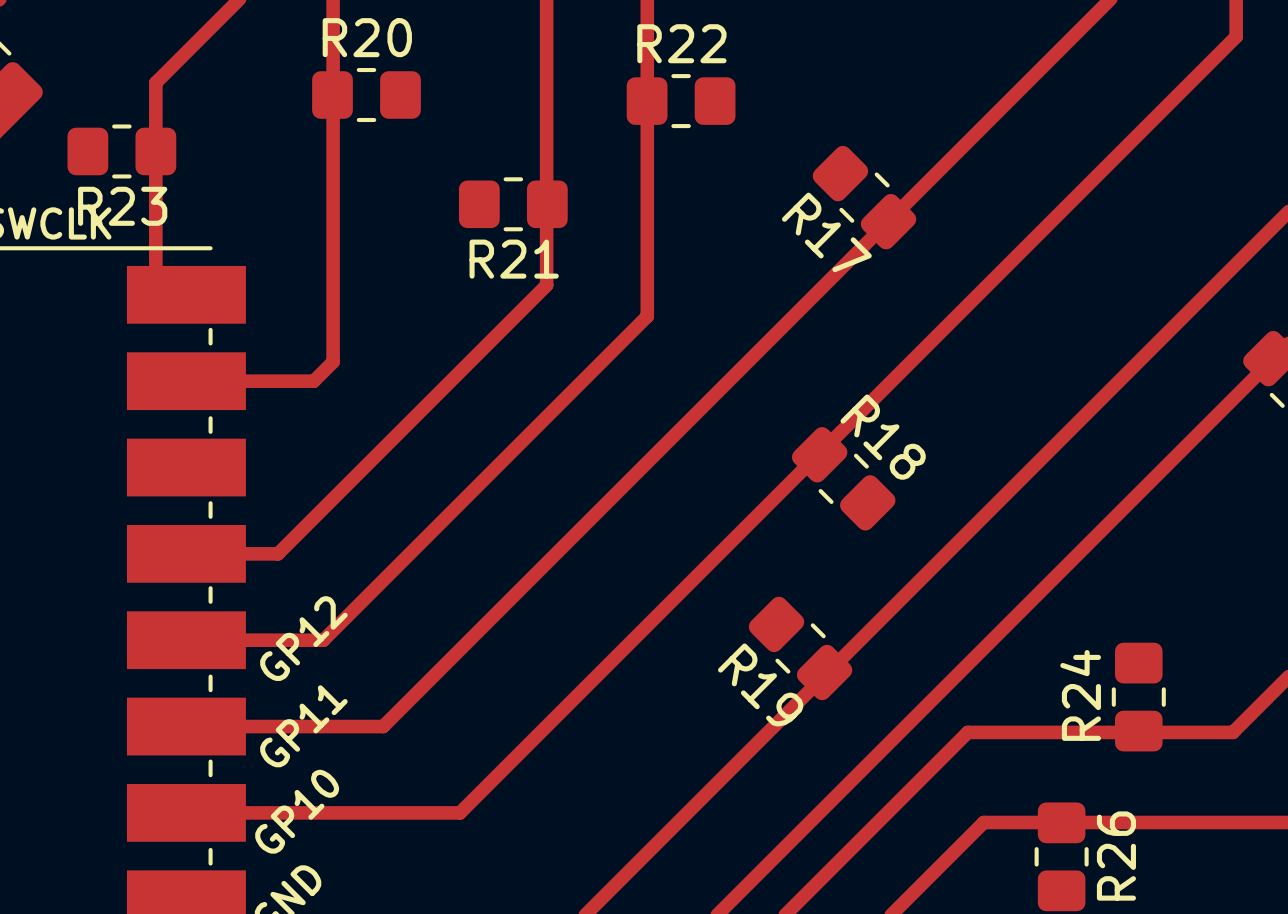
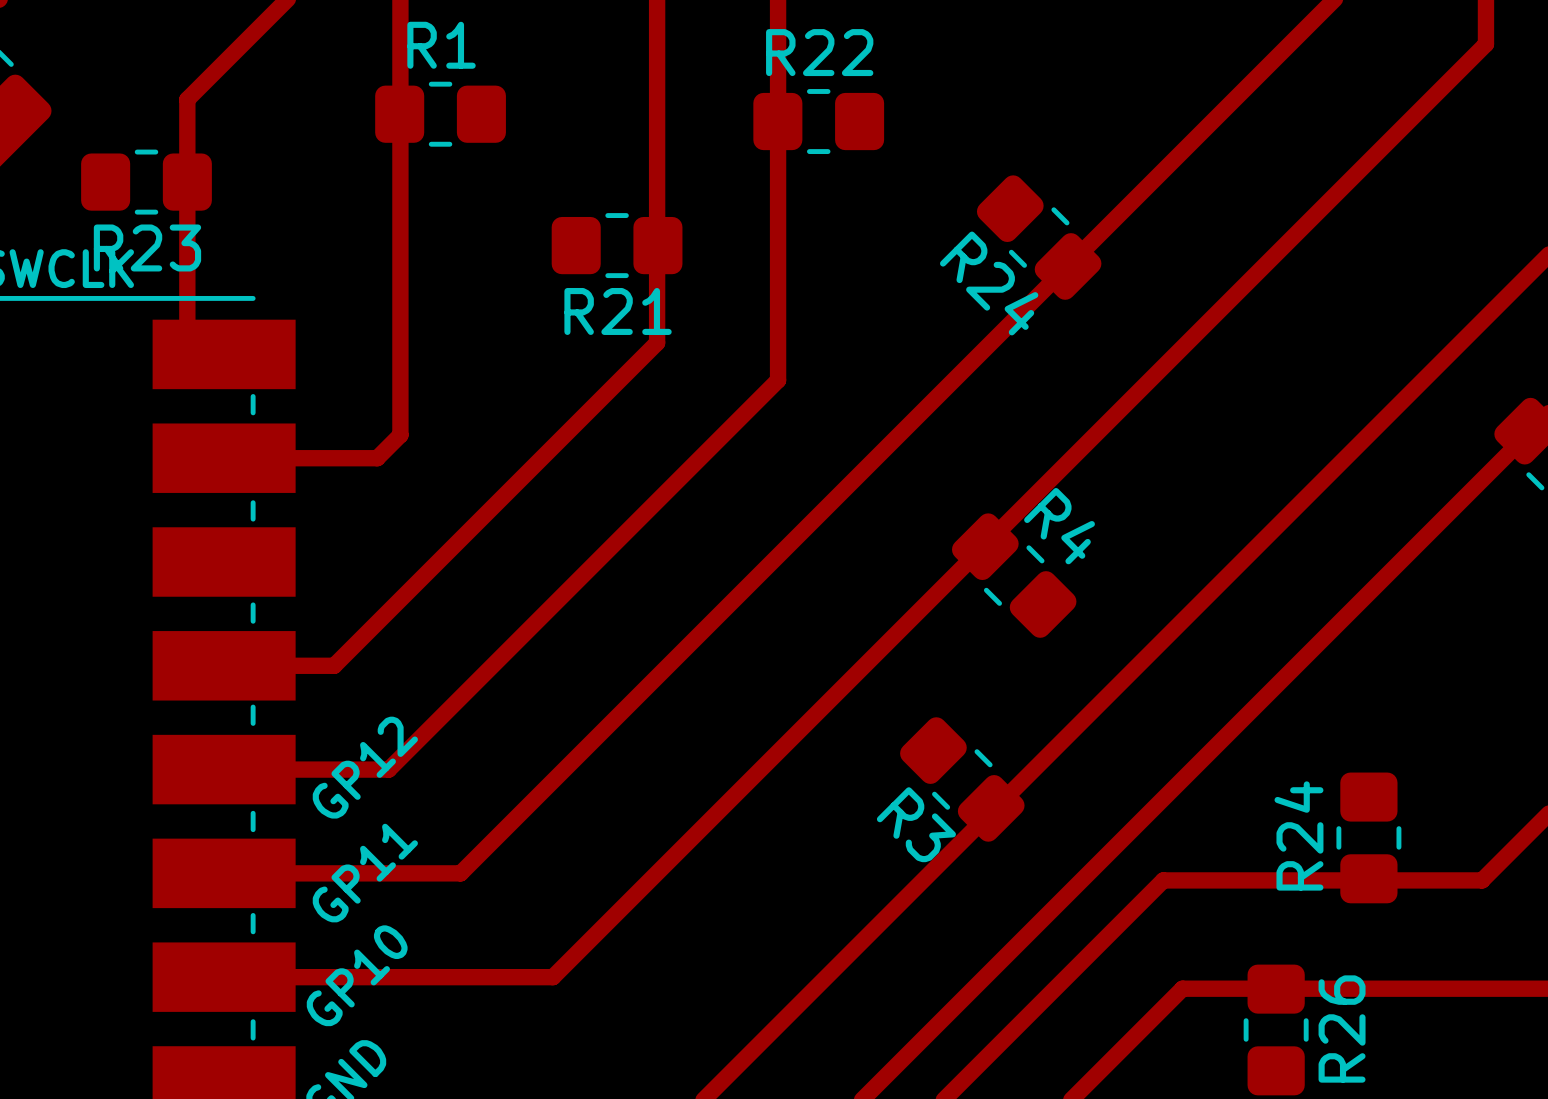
R20 name: R20 (367, 37) -> R1 (441, 45)
R17 name: R17 (826, 232) -> R24 (989, 283)
R18 name: R18 (883, 437) -> R4 (1059, 526)
R19 name: R19 (760, 684) -> R3 (916, 824)

